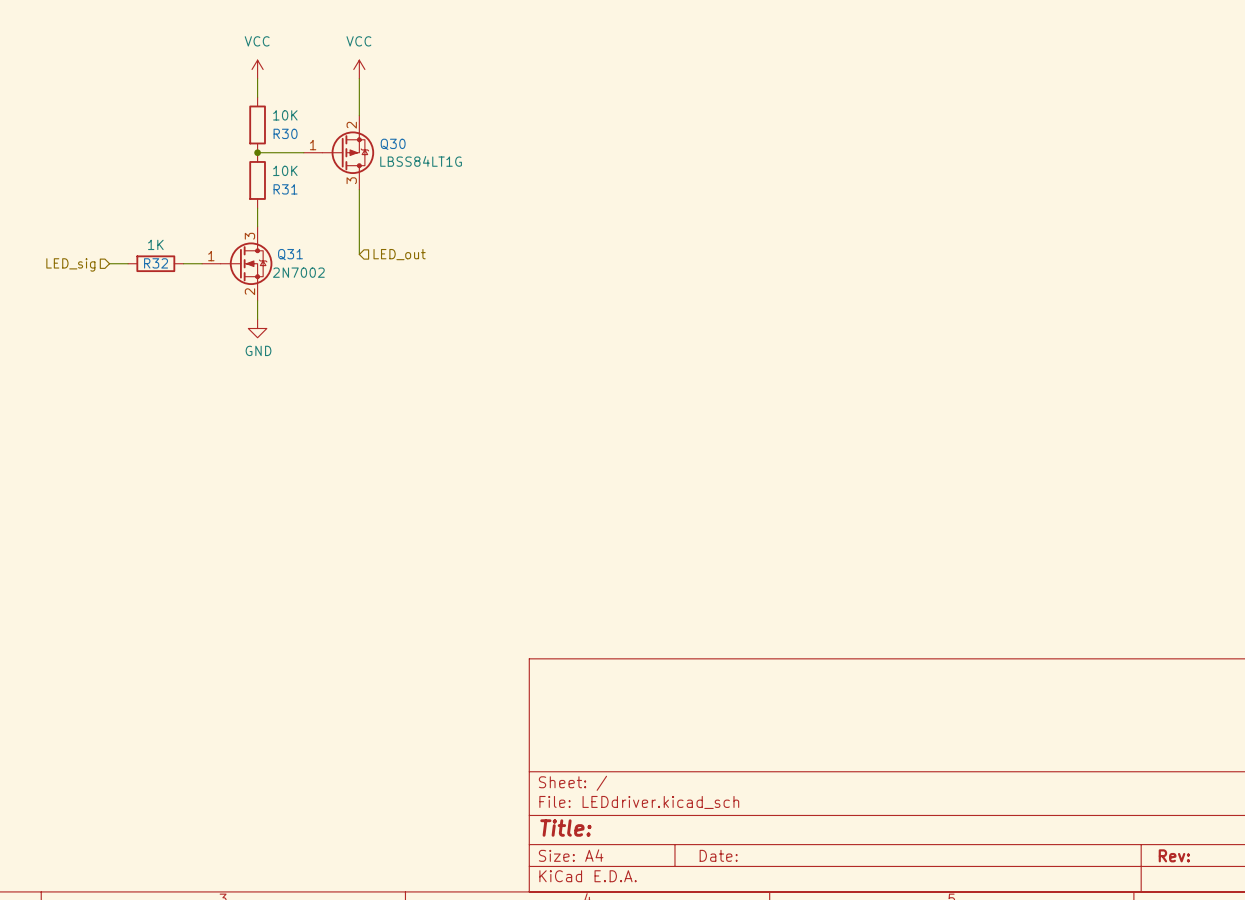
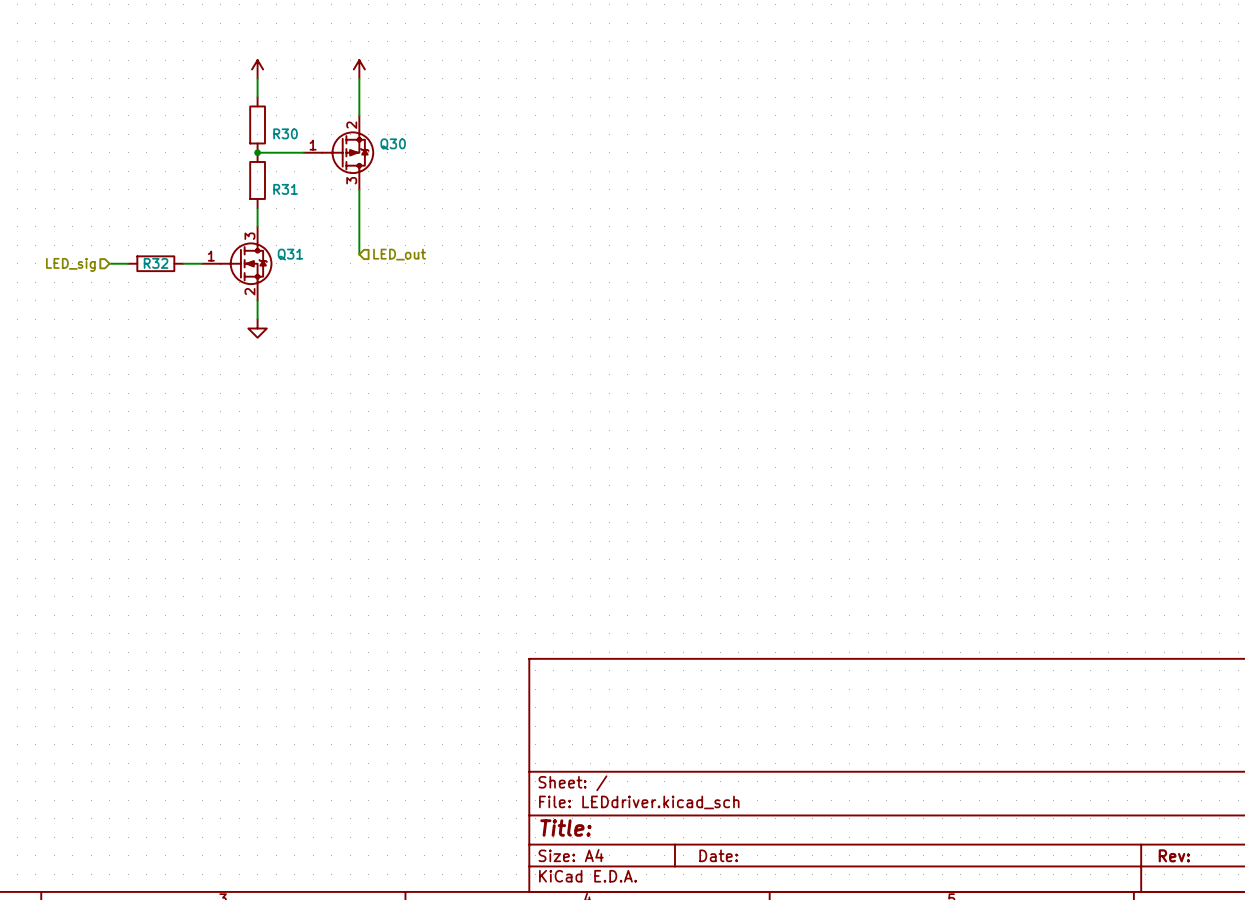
power symbol text: VCC (257, 41) -> none
power symbol text: VCC (358, 41) -> none
R30 value: 10K (285, 115) -> none
Q30 value: LBSS84LT1G (421, 161) -> none
R31 value: 10K (285, 170) -> none
R32 value: 1K (155, 244) -> none
Q31 value: 2N7002 (298, 272) -> none
power symbol text: GND (258, 350) -> none

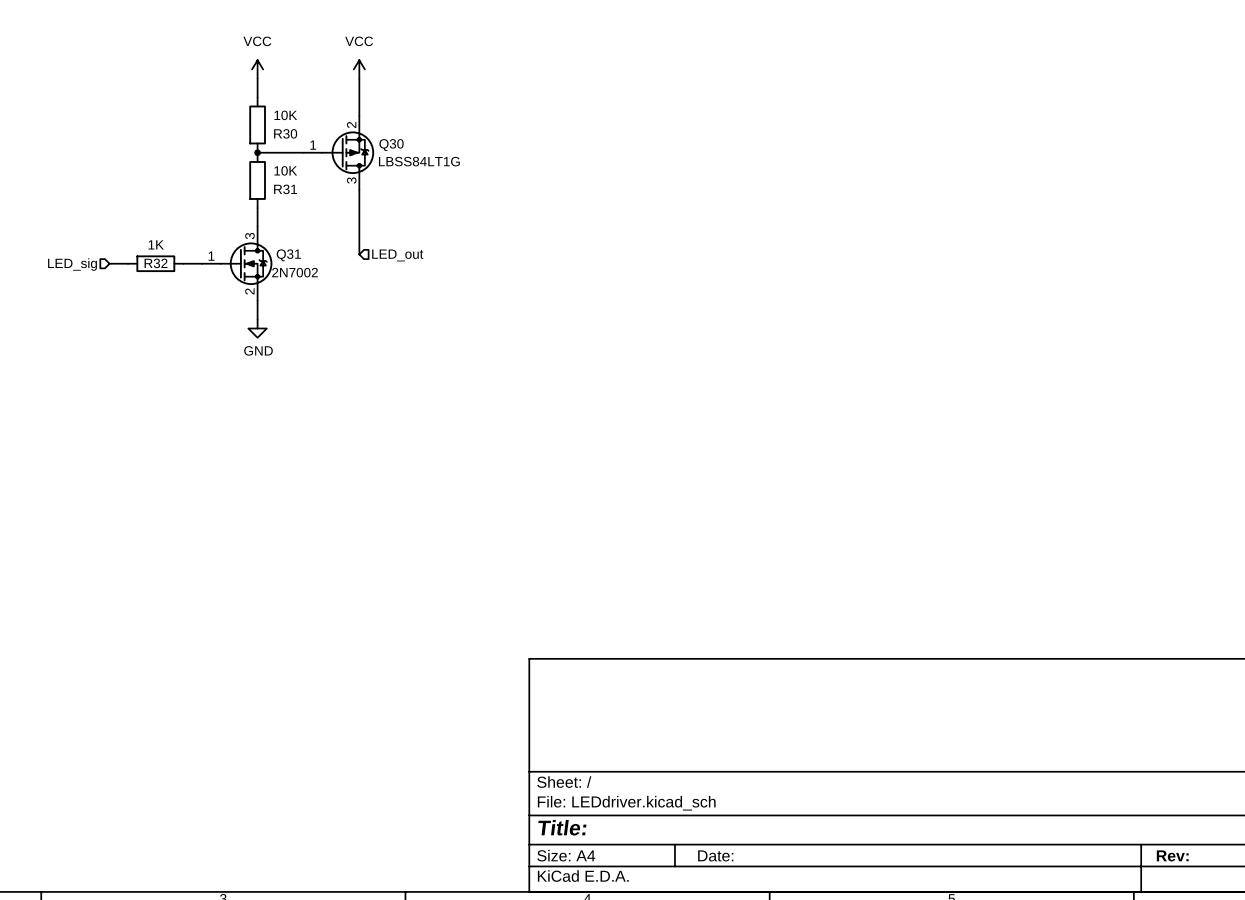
power symbol text: none -> VCC (257, 41)
power symbol text: none -> VCC (359, 41)
R30 value: none -> 10K (285, 115)
Q30 value: none -> LBSS84LT1G (419, 161)
R31 value: none -> 10K (285, 170)
R32 value: none -> 1K (156, 244)
Q31 value: none -> 2N7002 (295, 272)
power symbol text: none -> GND (258, 350)

